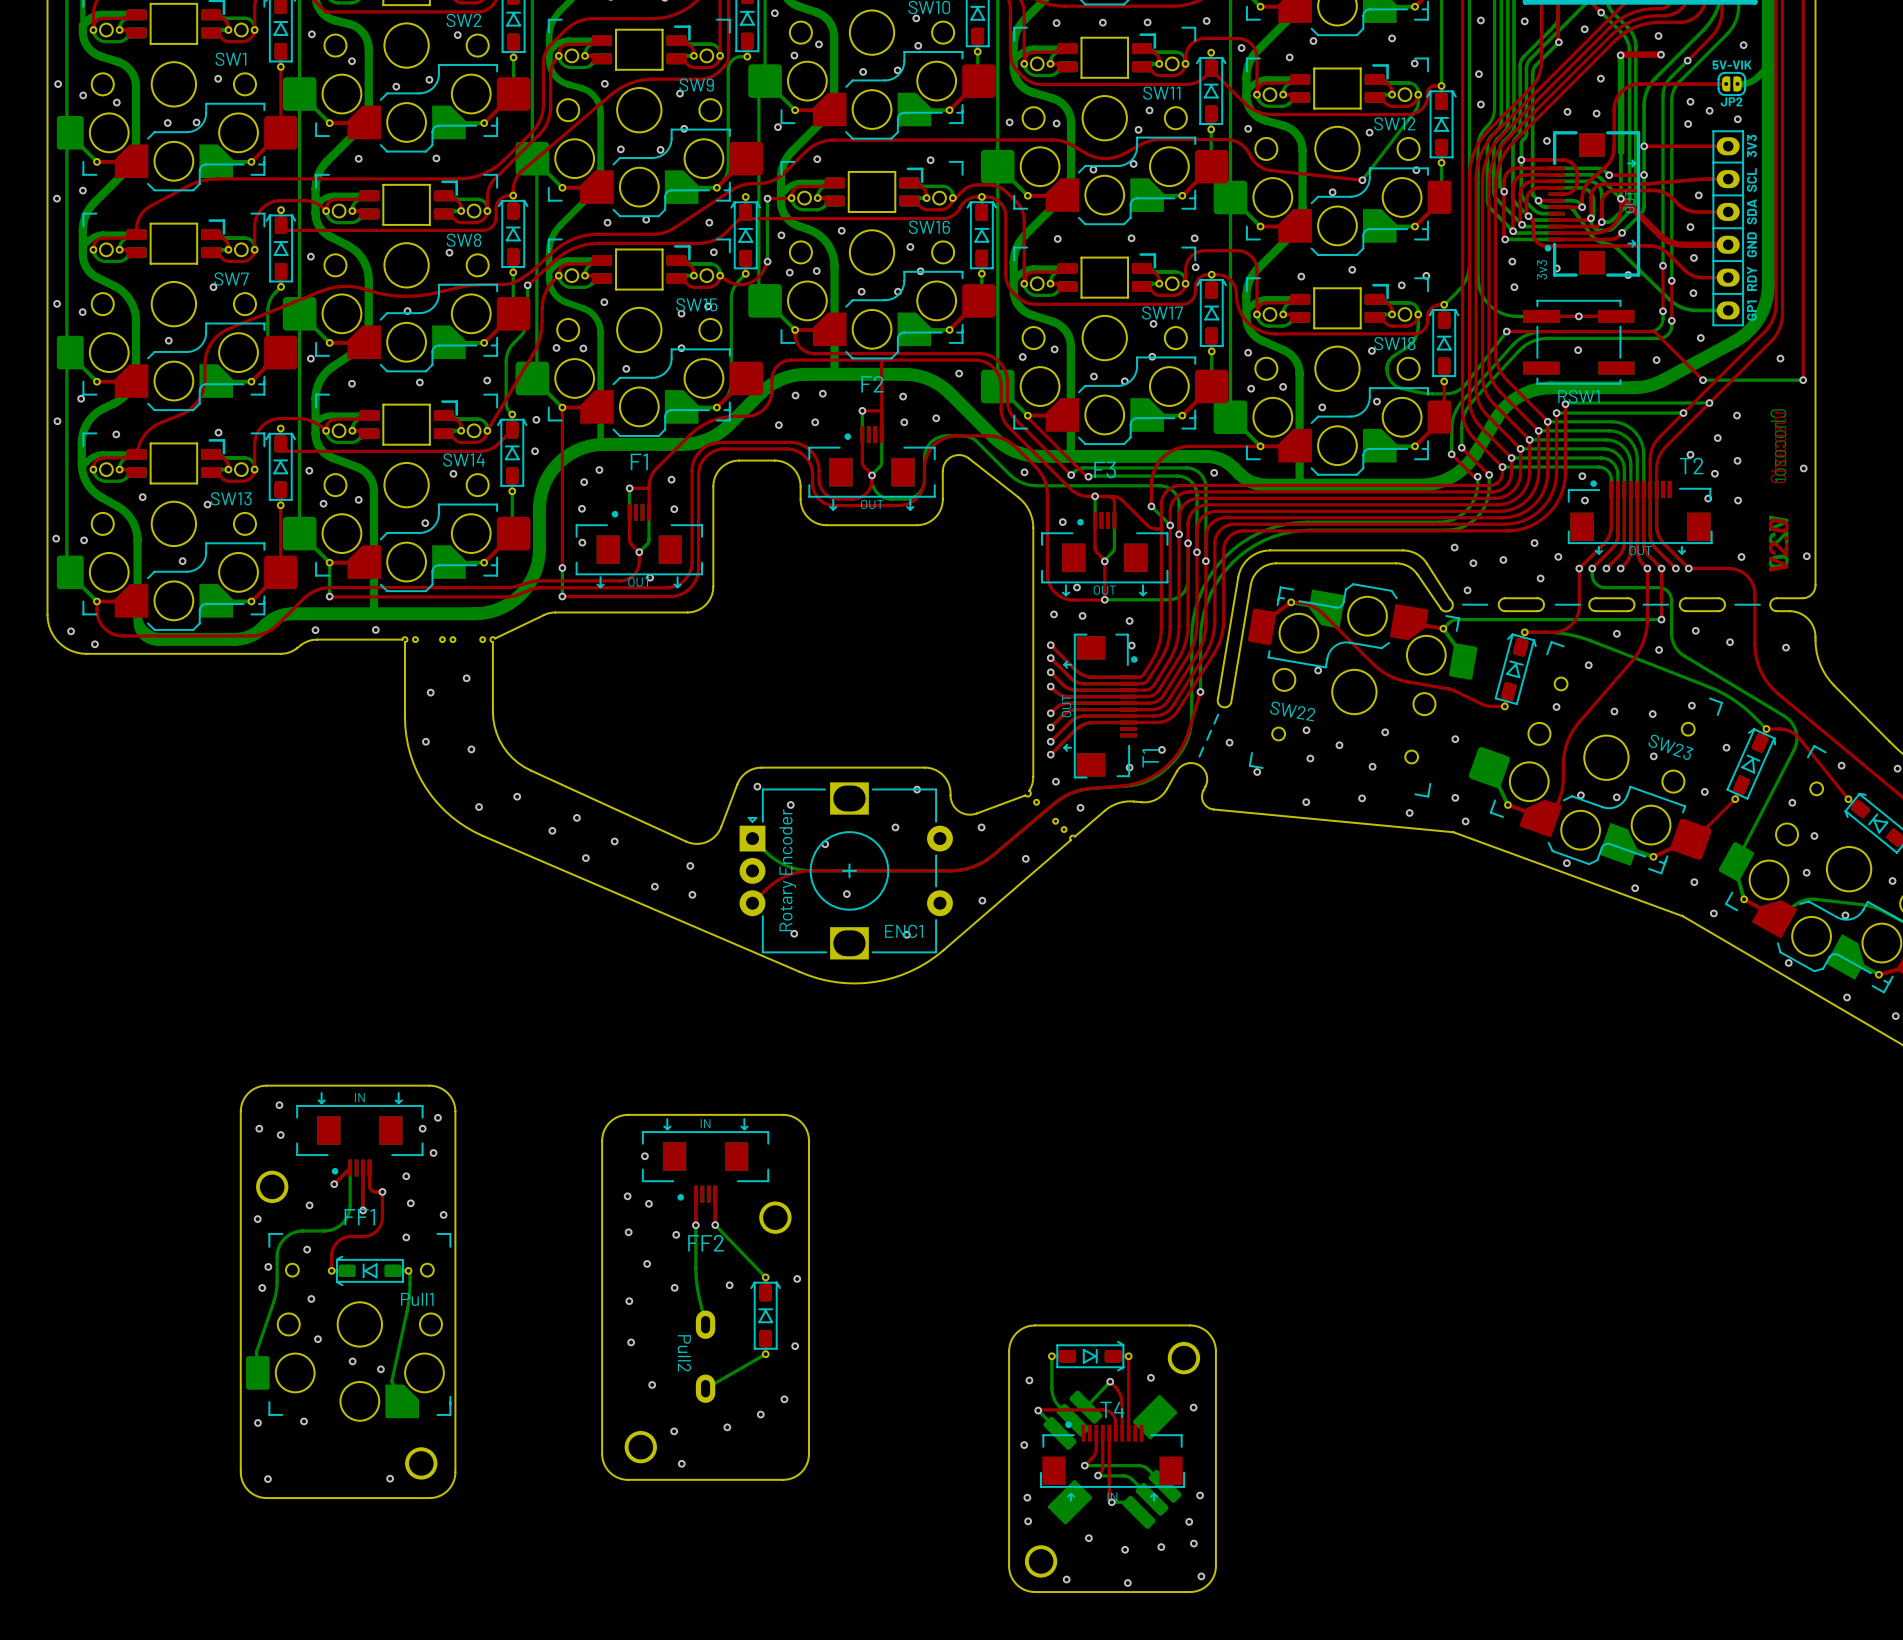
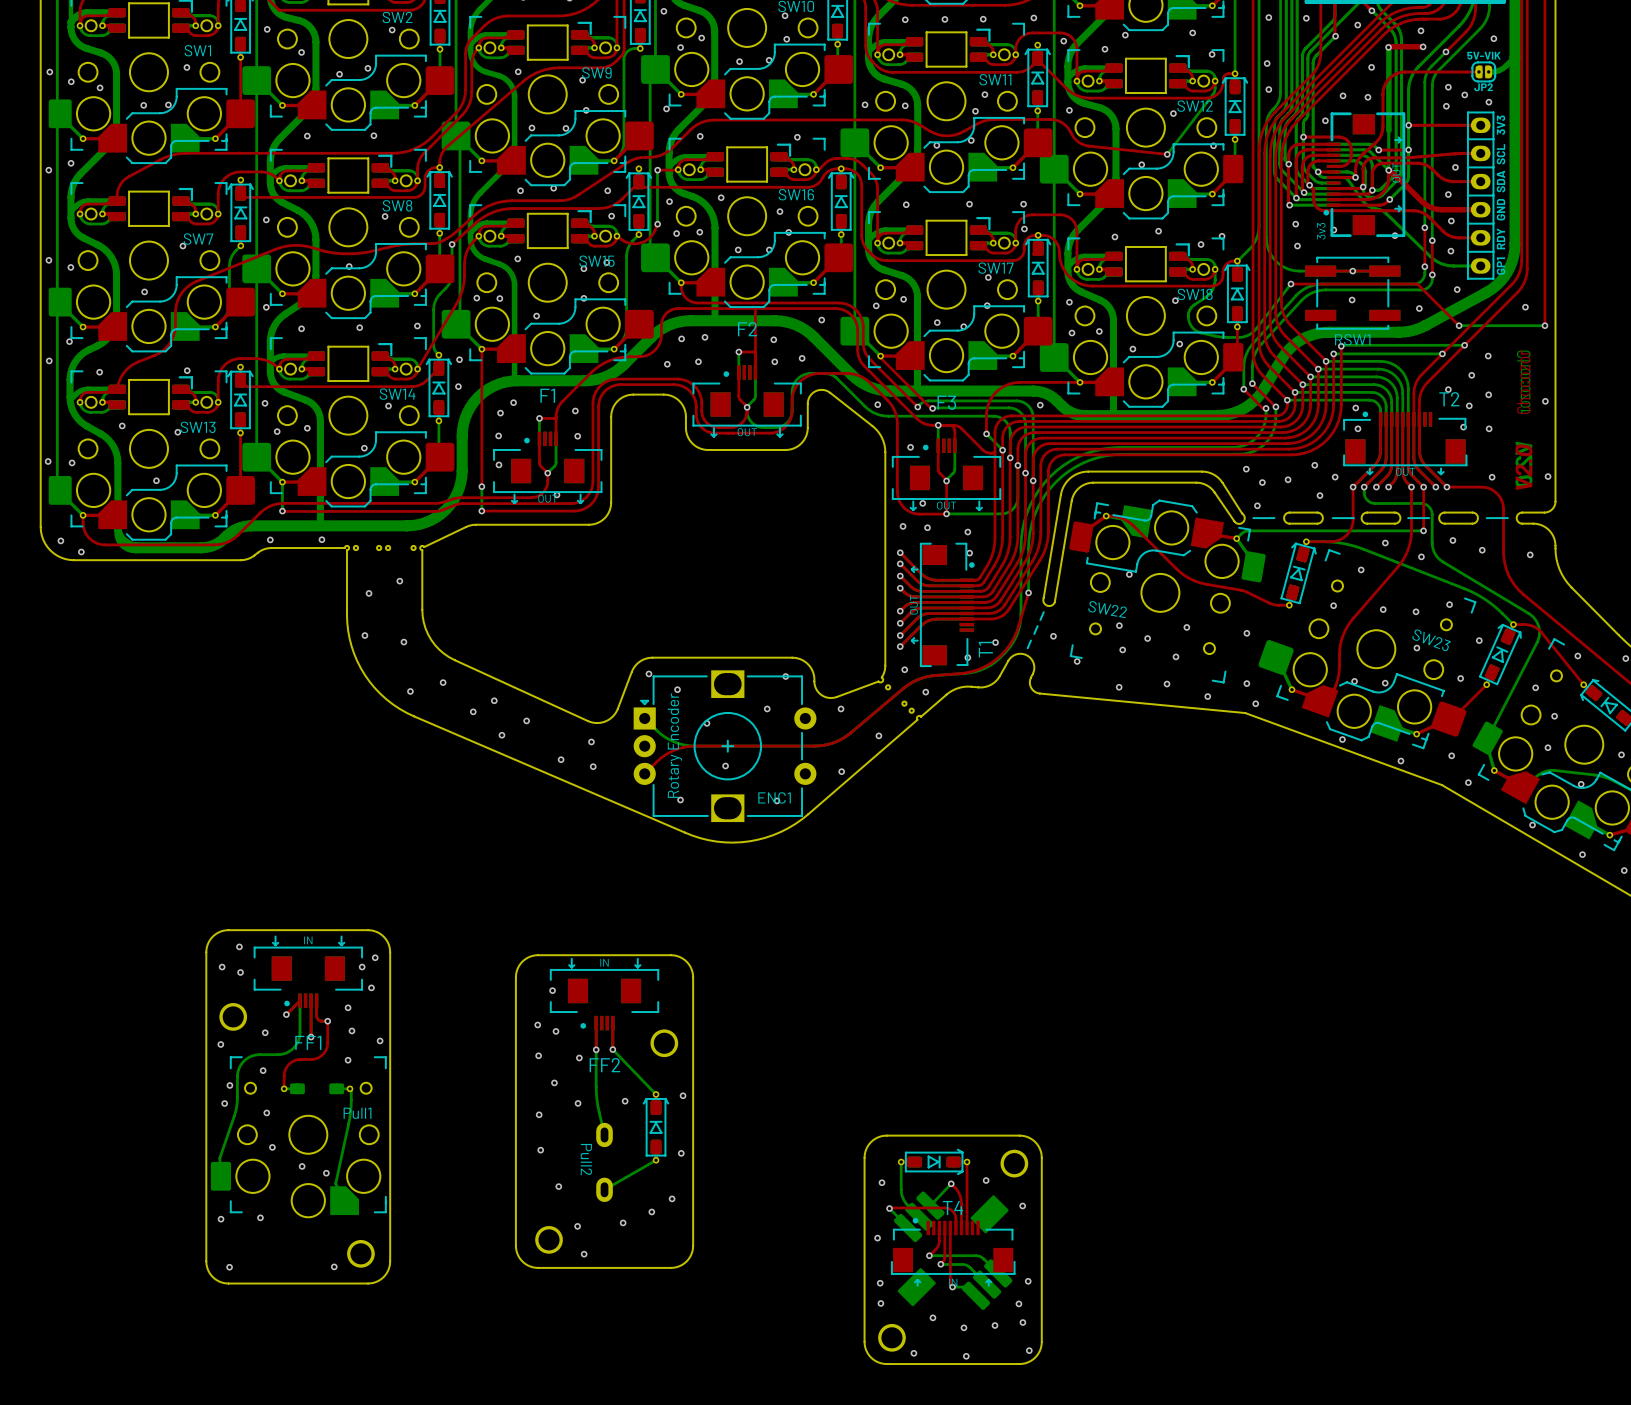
part footprint: [327, 1255, 413, 1286] -> [280, 1083, 354, 1095]

